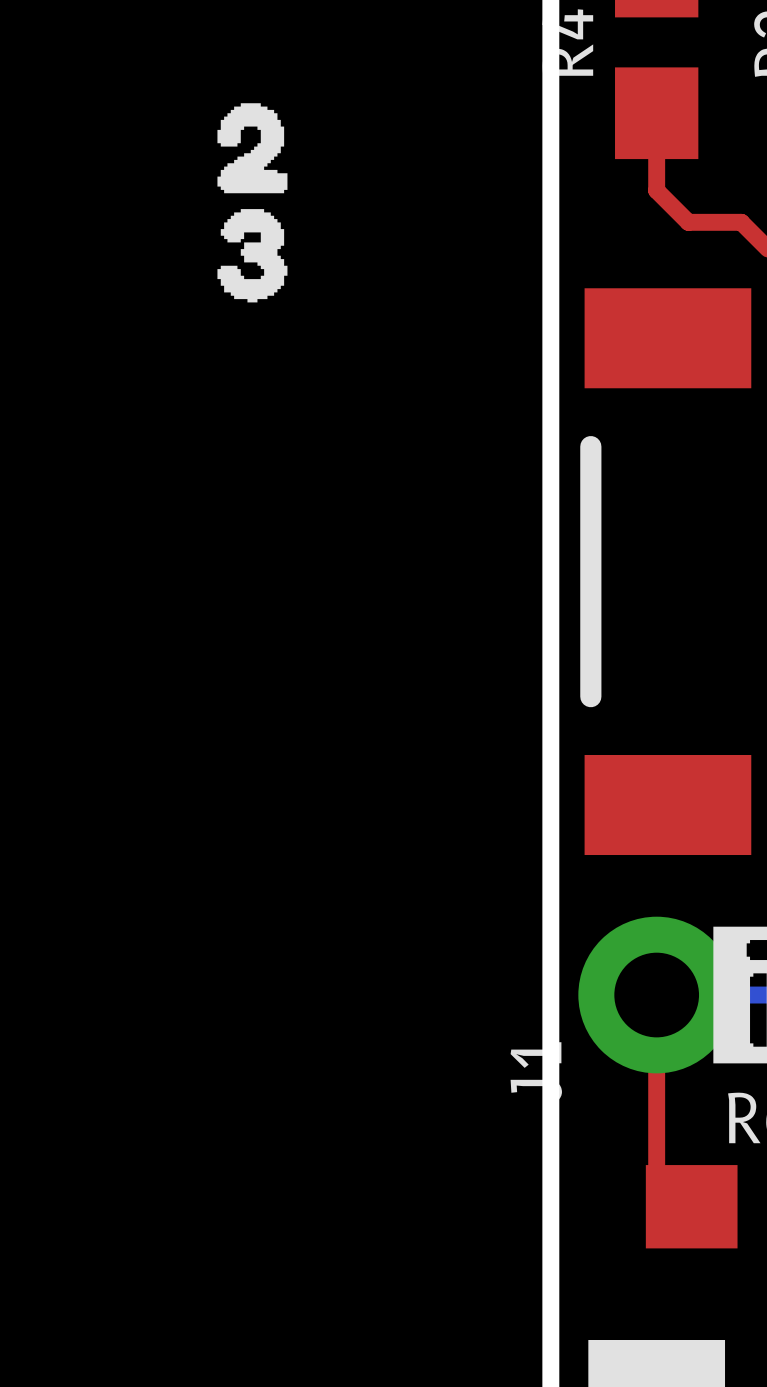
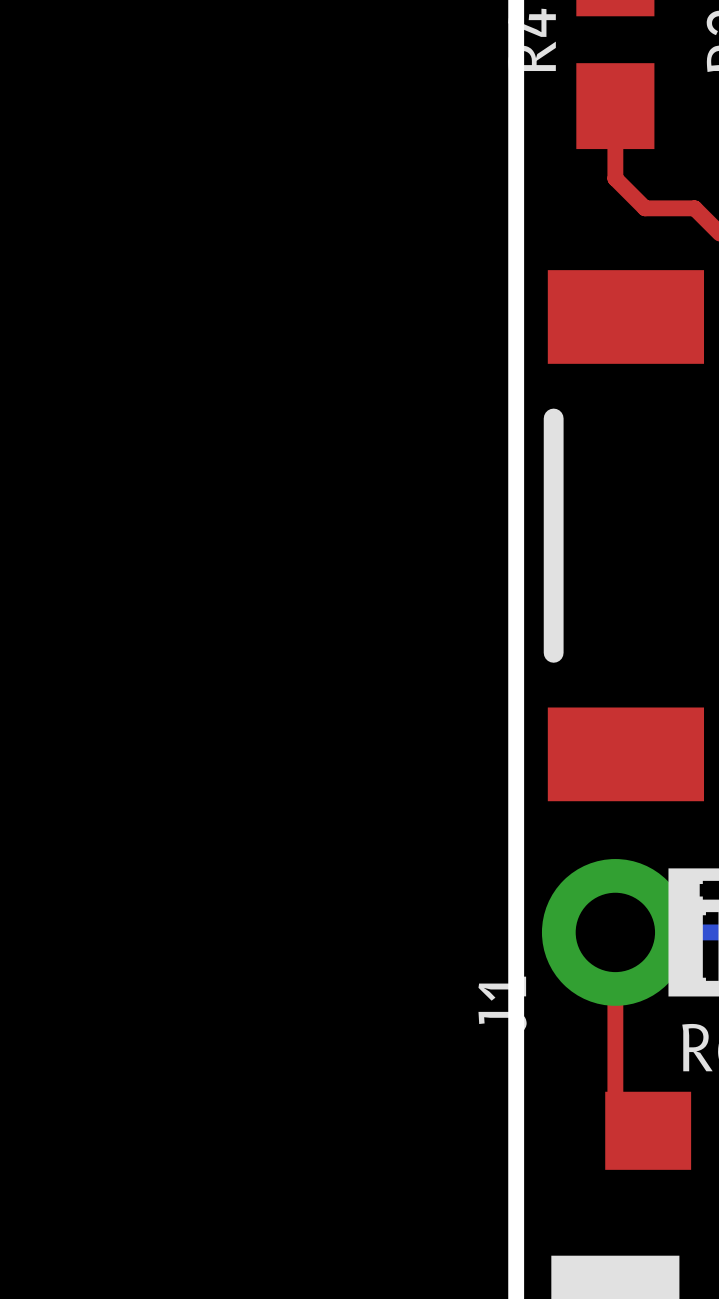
drawing: [217, 103, 288, 303] -> none

